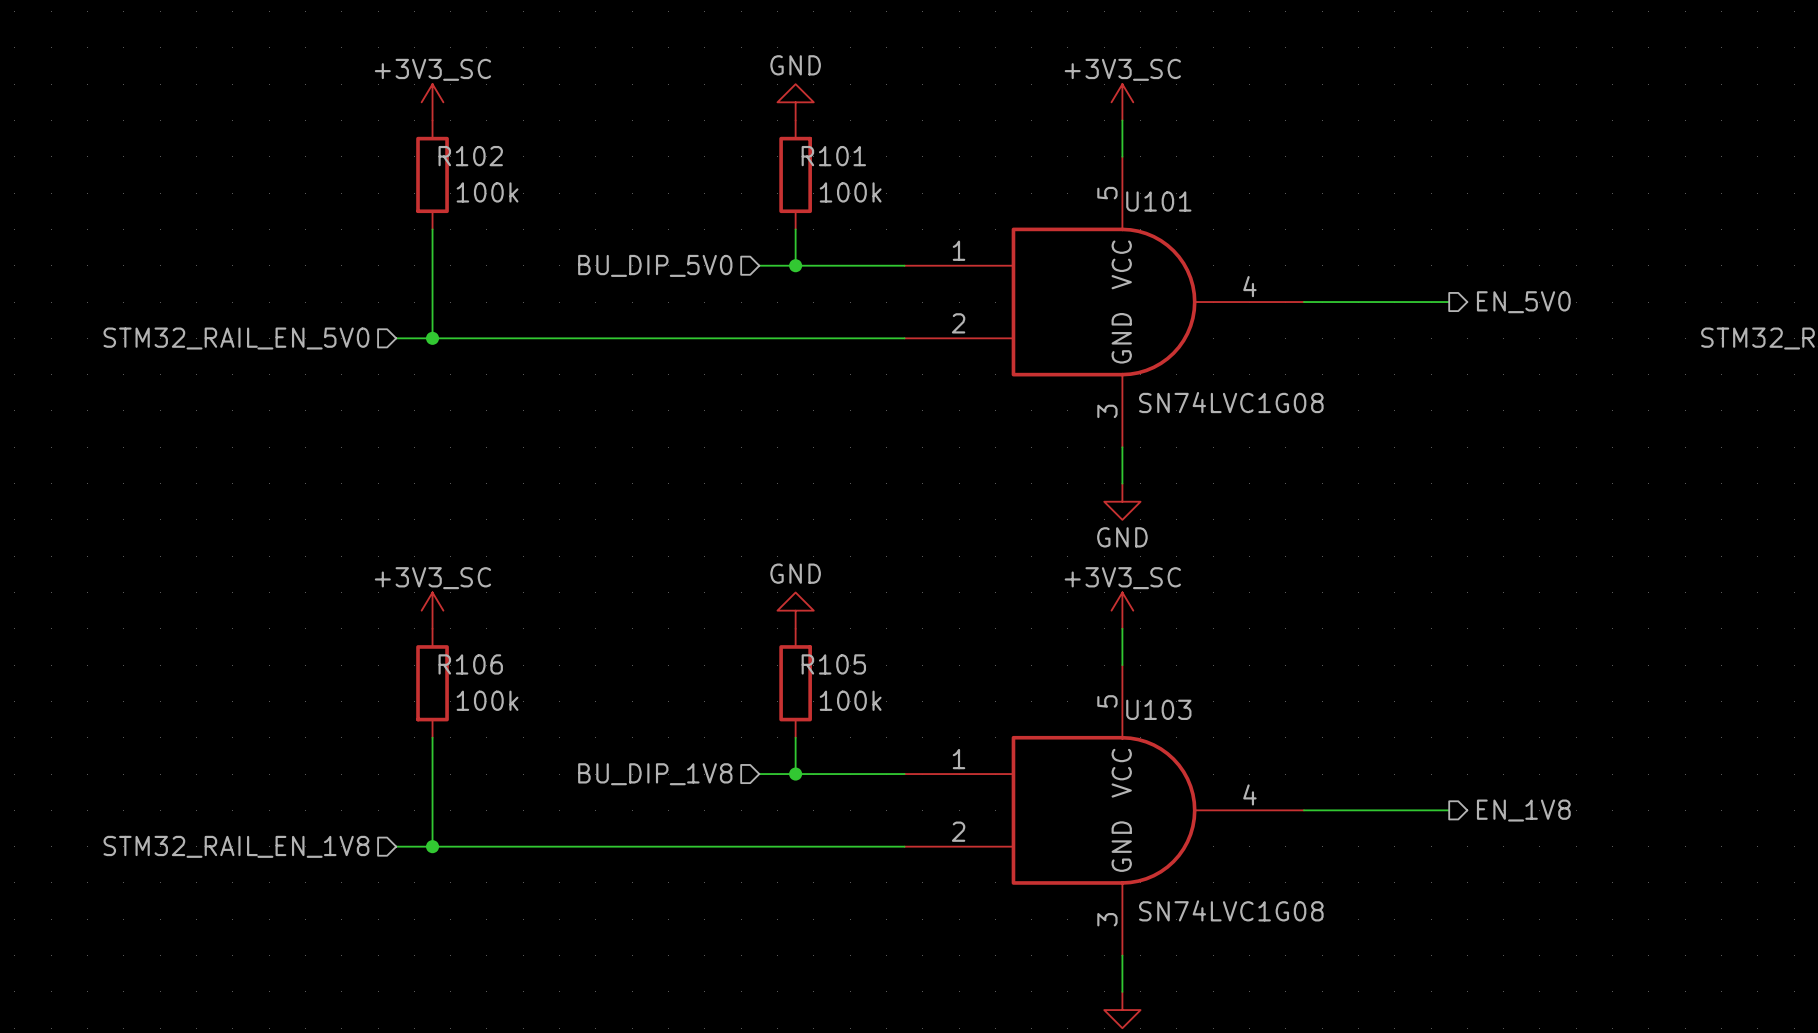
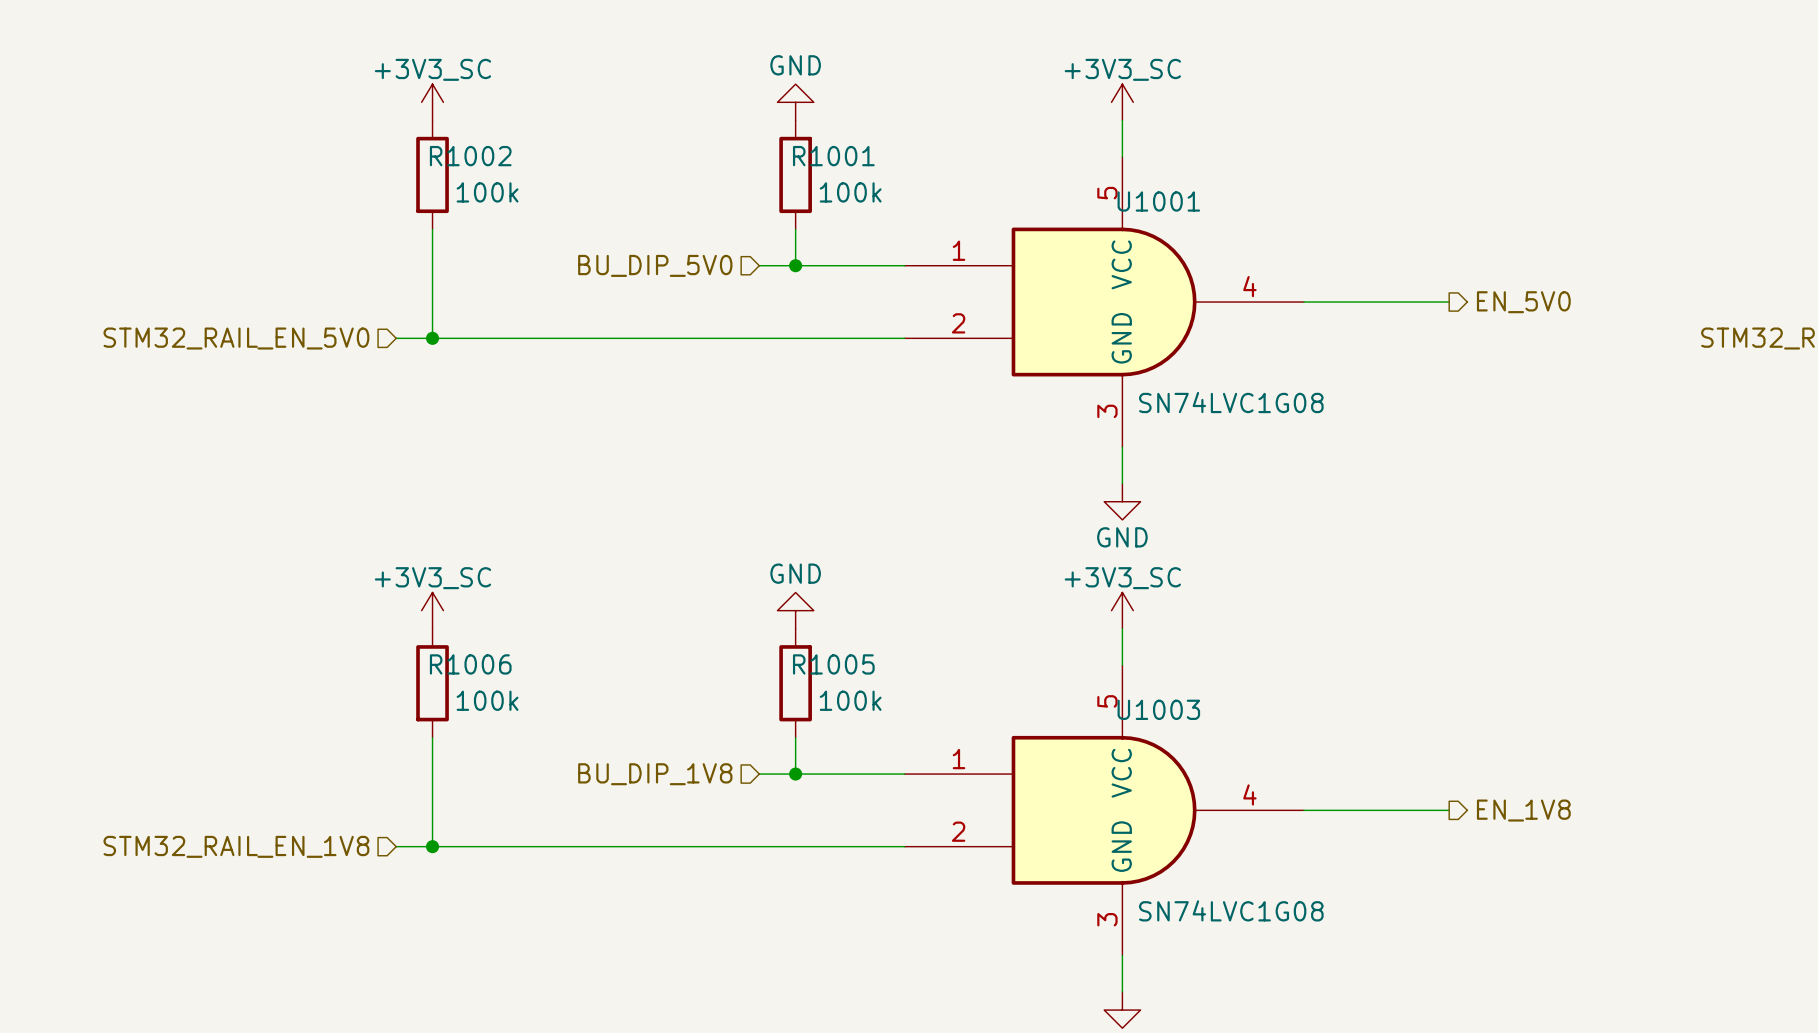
R102 name: R102 (470, 156) -> R1002 (470, 156)
R101 name: R101 (833, 156) -> R1001 (833, 156)
U101 name: U101 (1158, 201) -> U1001 (1158, 201)
R106 name: R106 (470, 664) -> R1006 (470, 664)
R105 name: R105 (833, 664) -> R1005 (833, 664)
U103 name: U103 (1158, 709) -> U1003 (1158, 709)

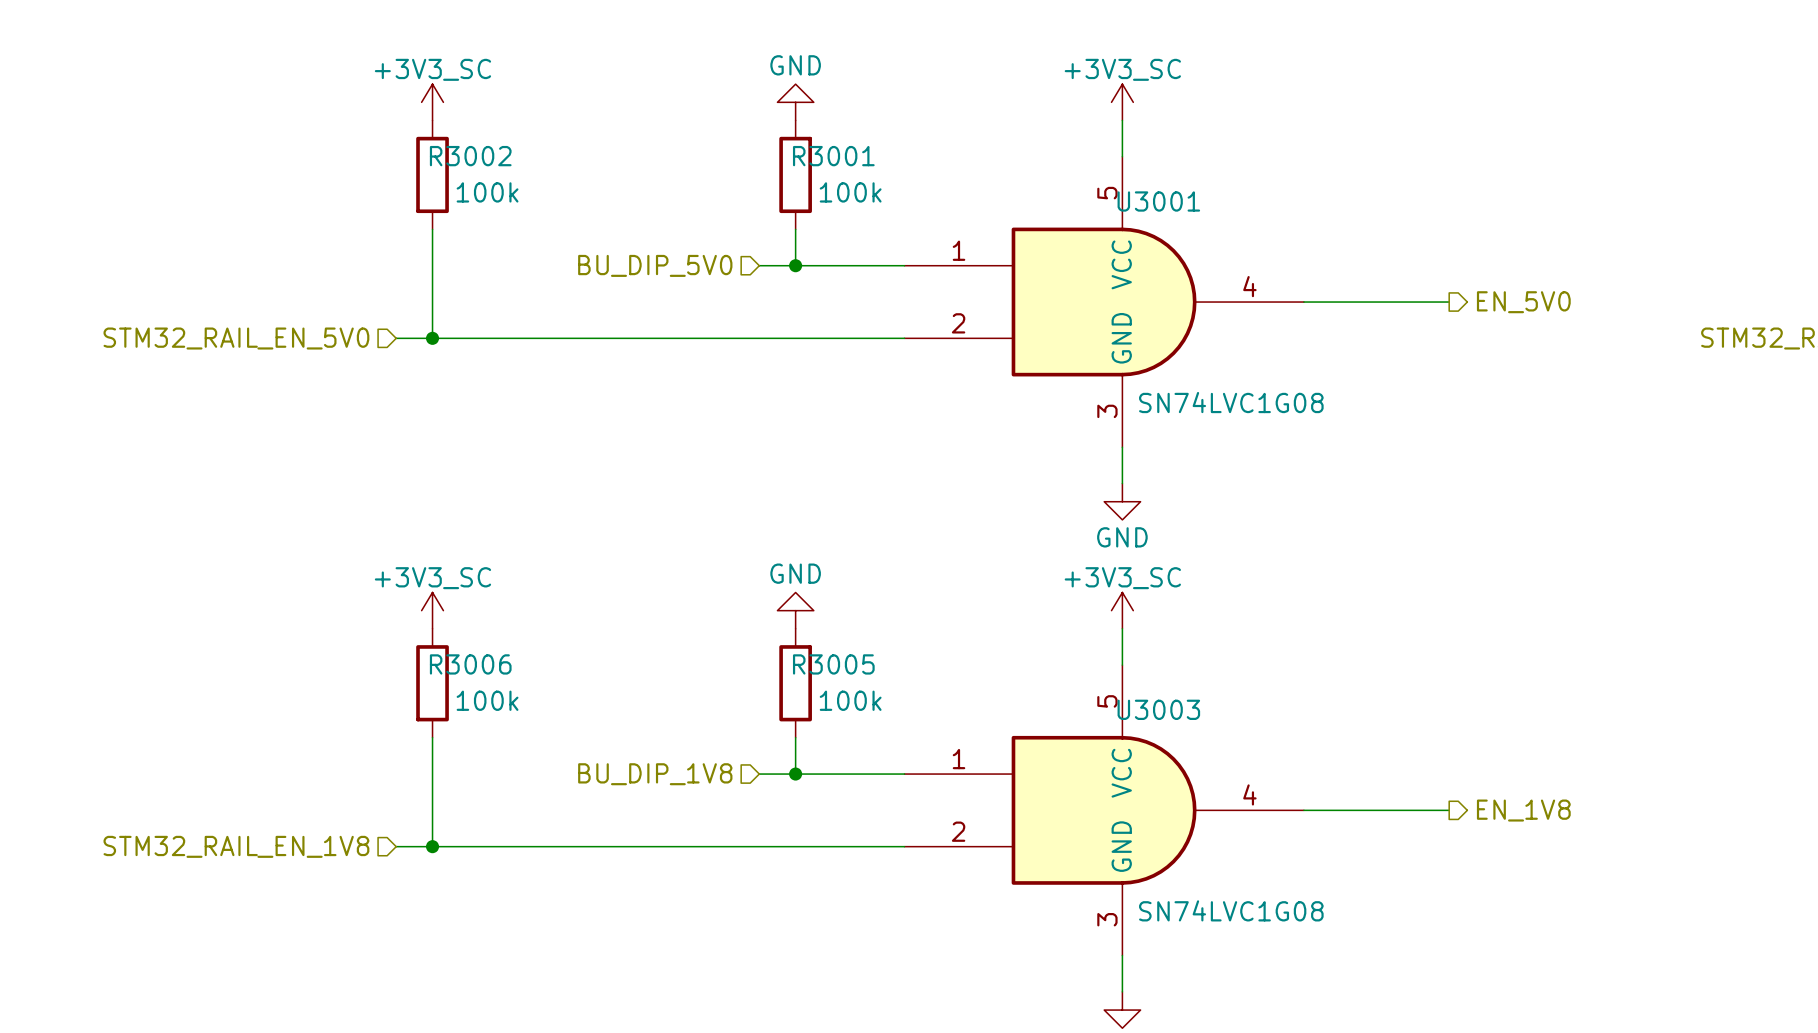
R1002 name: R1002 (470, 156) -> R3002 (470, 156)
R1001 name: R1001 (833, 156) -> R3001 (833, 156)
U1001 name: U1001 (1158, 201) -> U3001 (1158, 201)
R1006 name: R1006 (470, 664) -> R3006 (470, 664)
R1005 name: R1005 (833, 664) -> R3005 (833, 664)
U1003 name: U1003 (1158, 709) -> U3003 (1158, 709)

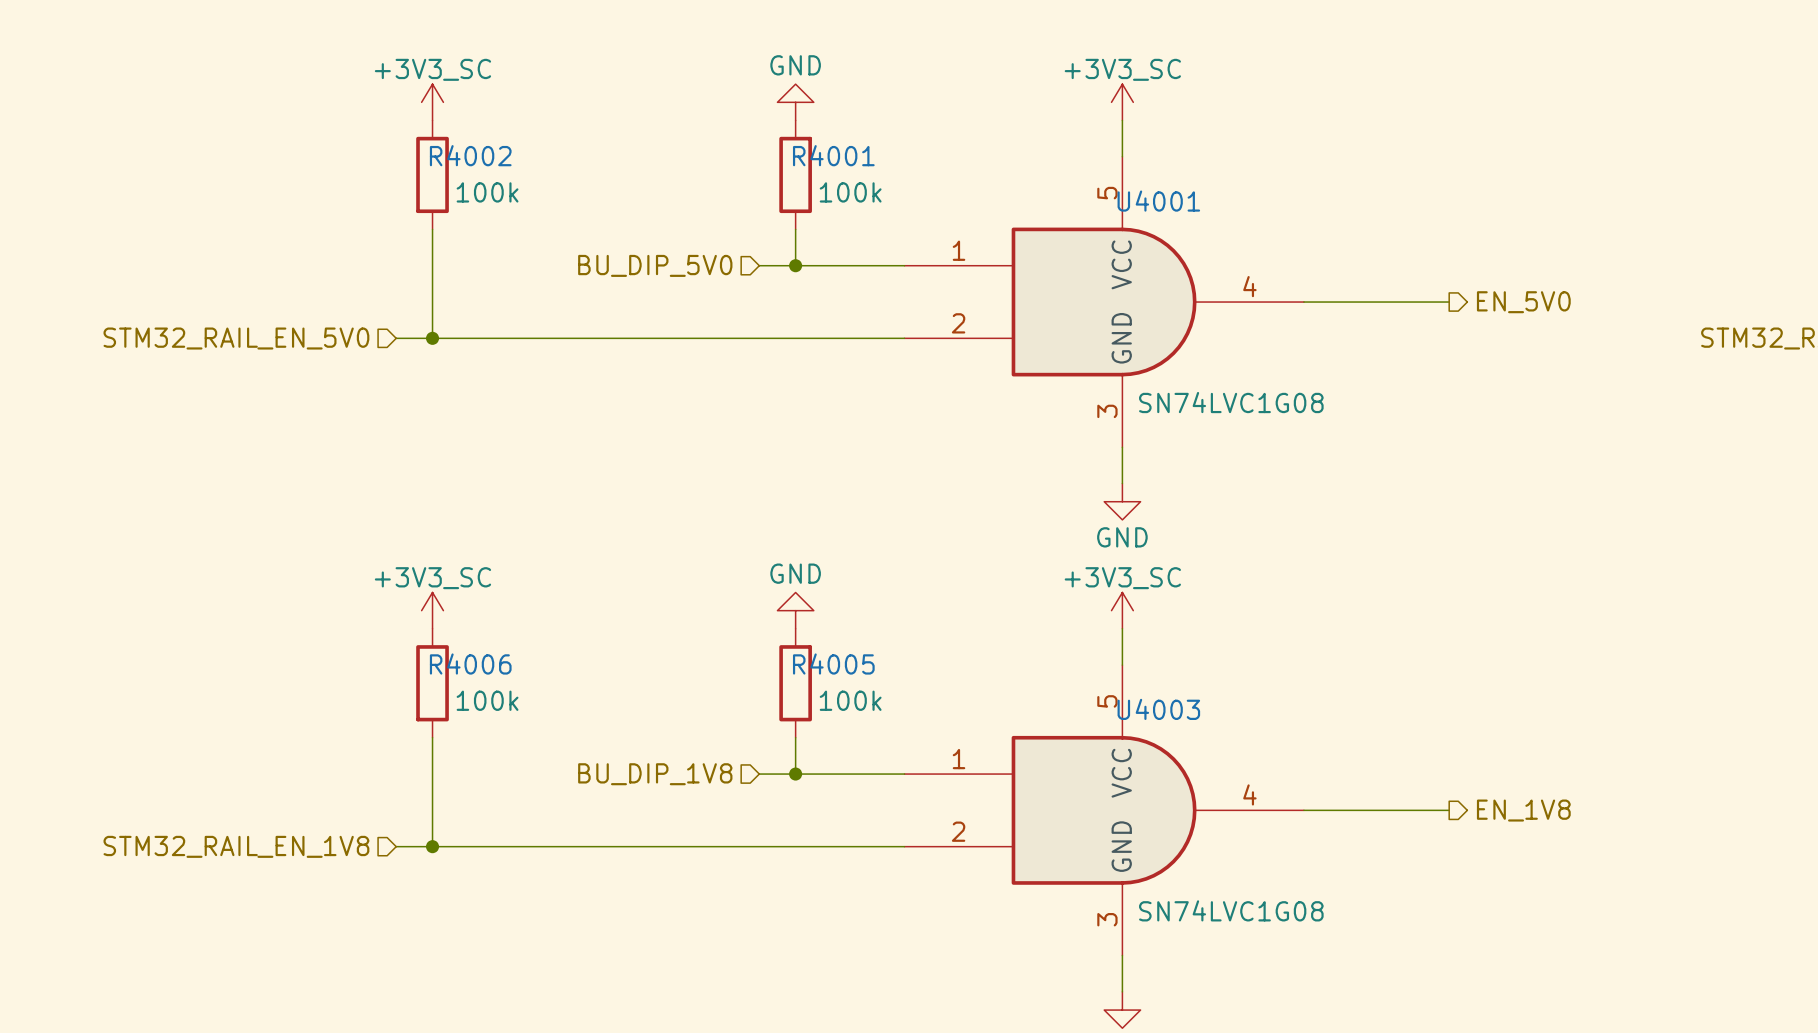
R3002 name: R3002 (470, 156) -> R4002 (470, 155)
R3001 name: R3001 (833, 156) -> R4001 (833, 155)
U3001 name: U3001 (1158, 201) -> U4001 (1158, 201)
R3006 name: R3006 (470, 664) -> R4006 (470, 664)
R3005 name: R3005 (833, 664) -> R4005 (833, 664)
U3003 name: U3003 (1158, 709) -> U4003 (1158, 709)

